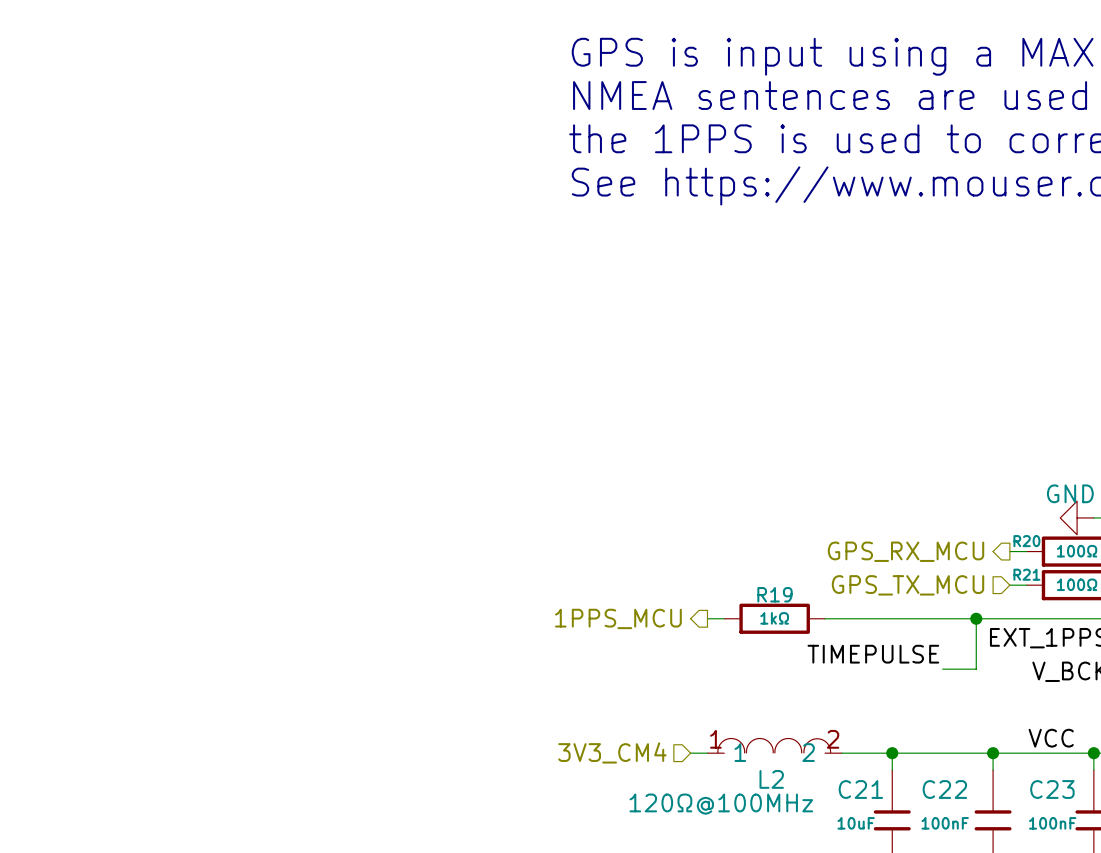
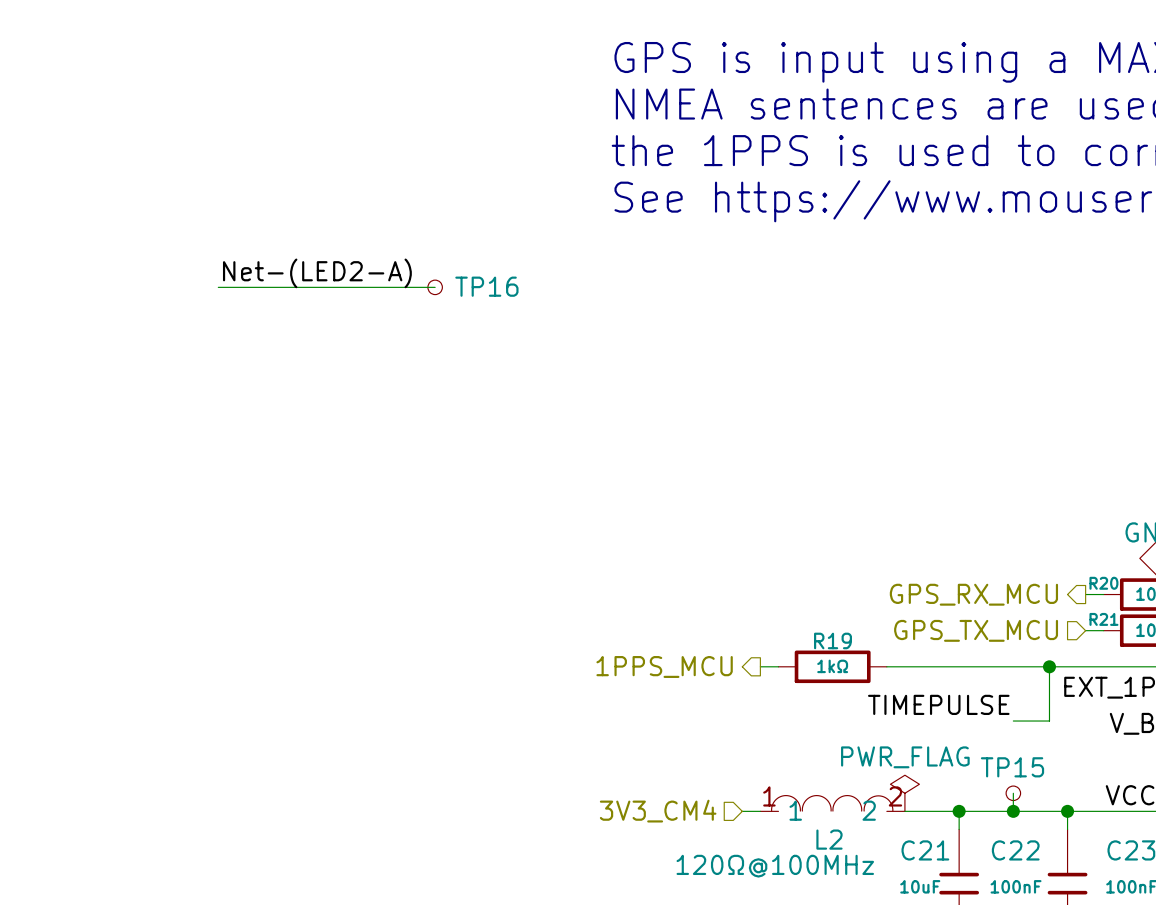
label: none -> Net-(LED2-A) (317, 273)
wire: none -> (218, 287) (435, 287)
TP16: none -> (435, 287)
power symbol: none -> PWR_FLAG (904, 793)
wire: none -> (1013, 793) (1013, 811)
TP15: none -> (1013, 793)
junction: none -> (1013, 811)

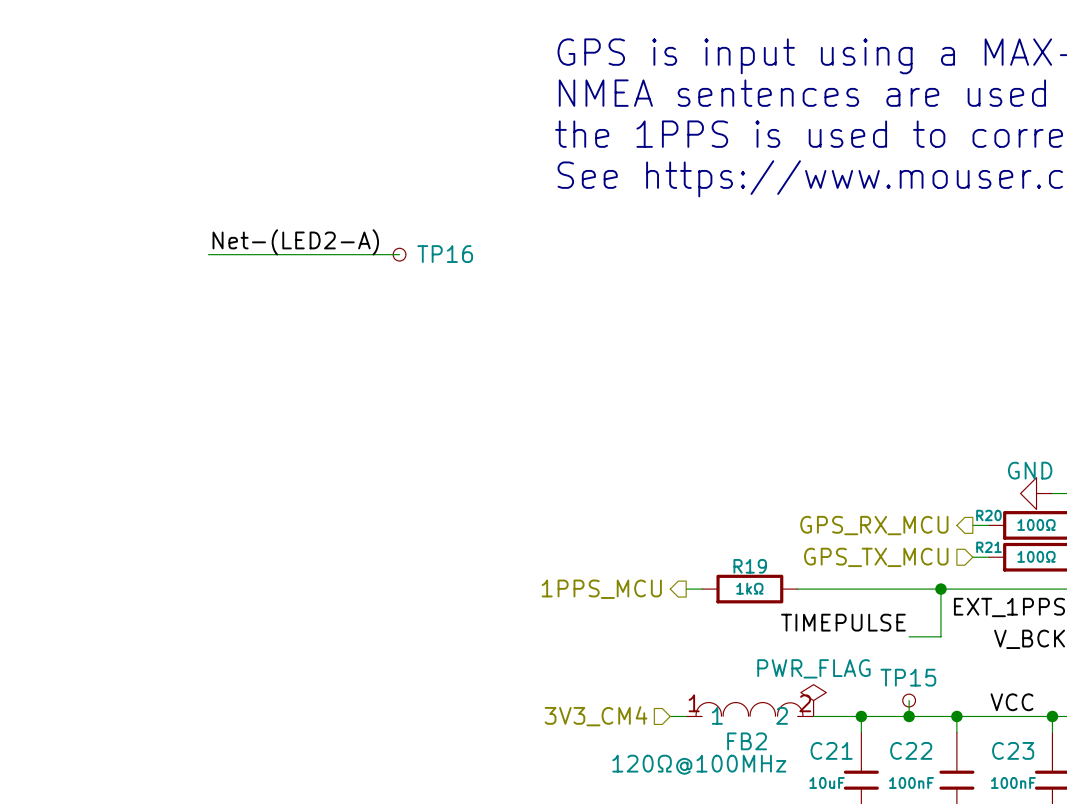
L2 name: L2 (829, 839) -> FB2 (747, 741)

